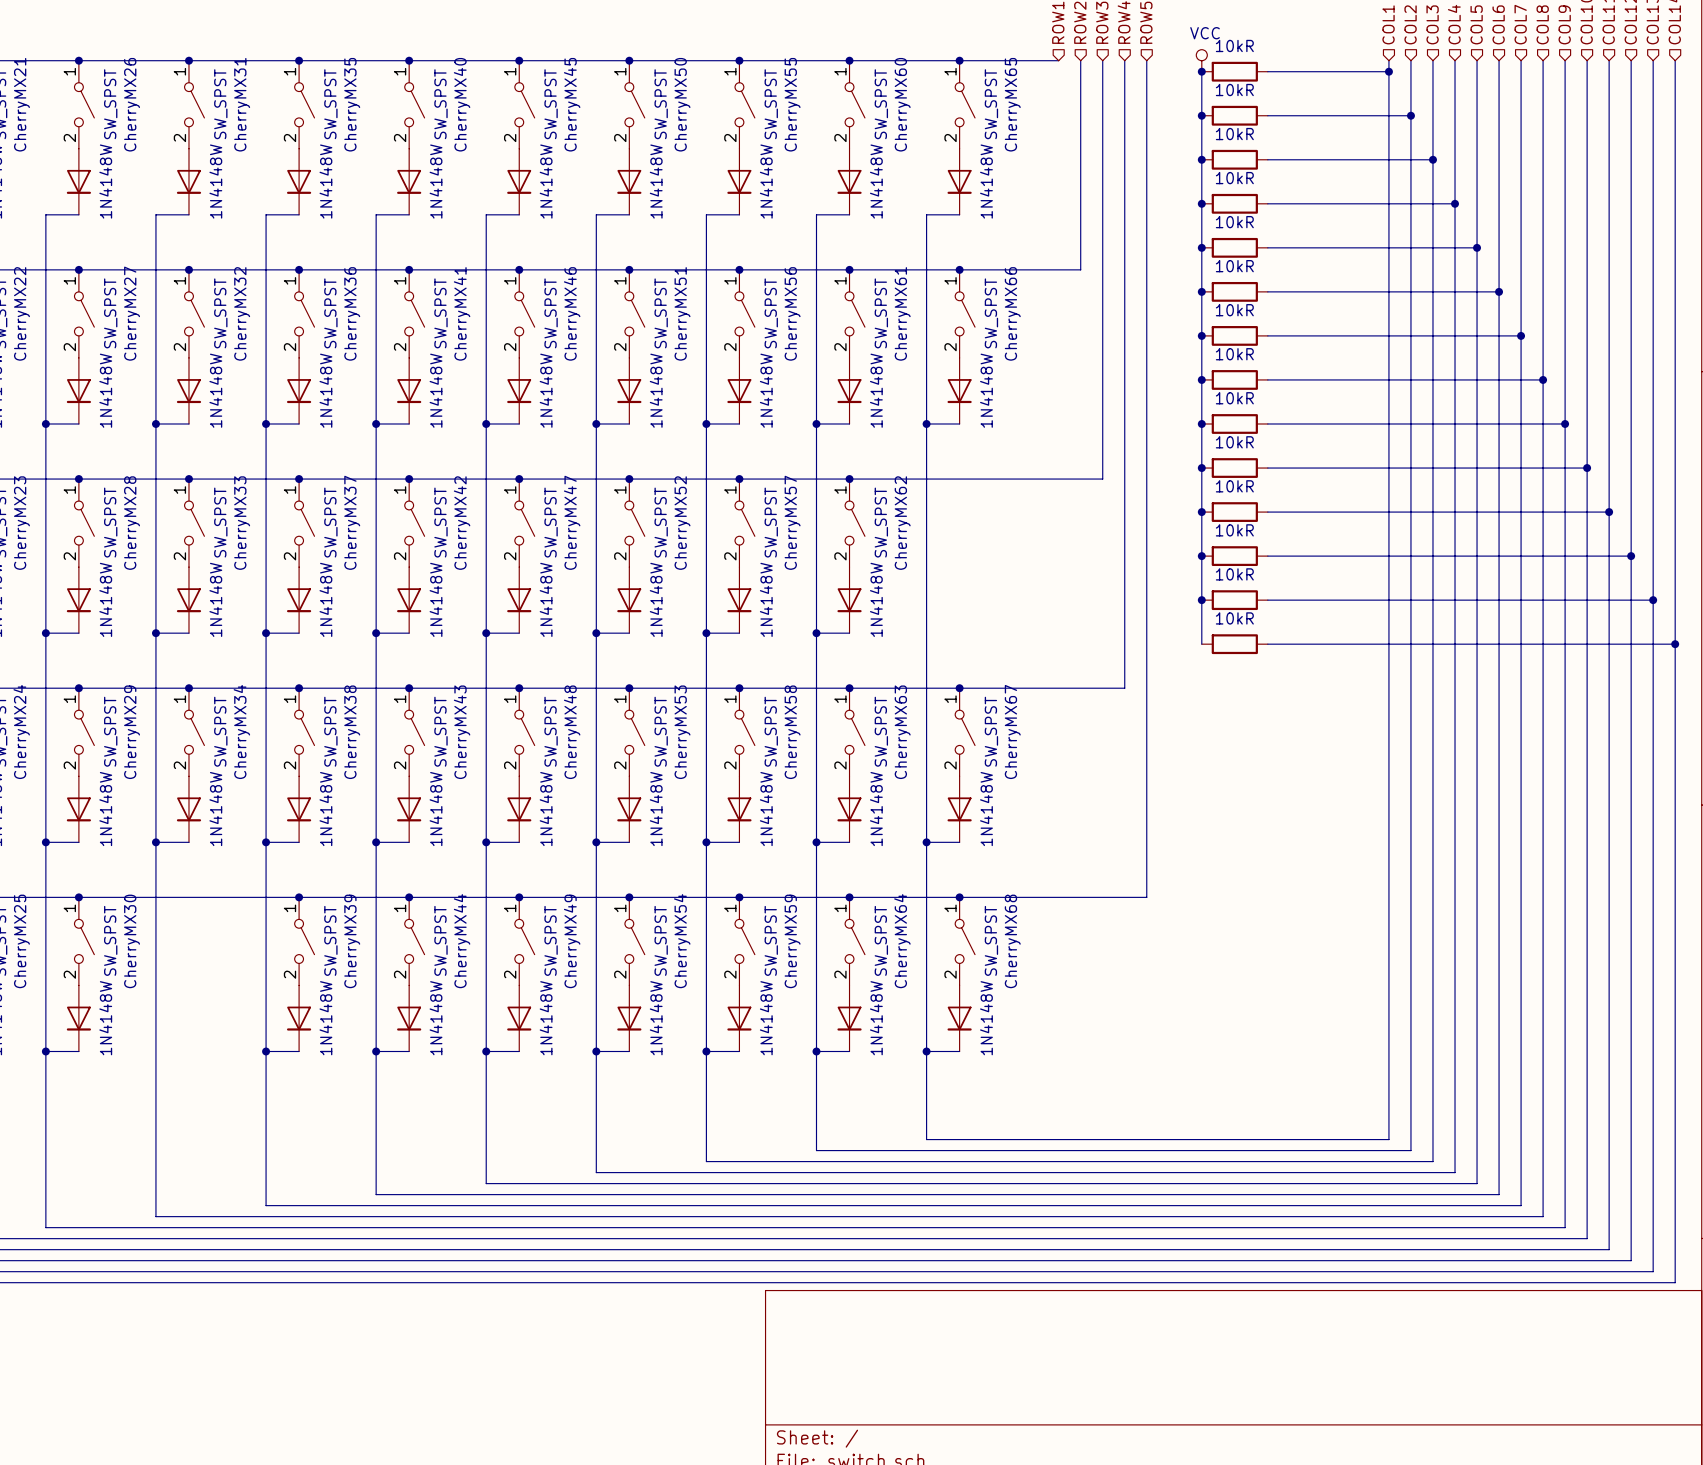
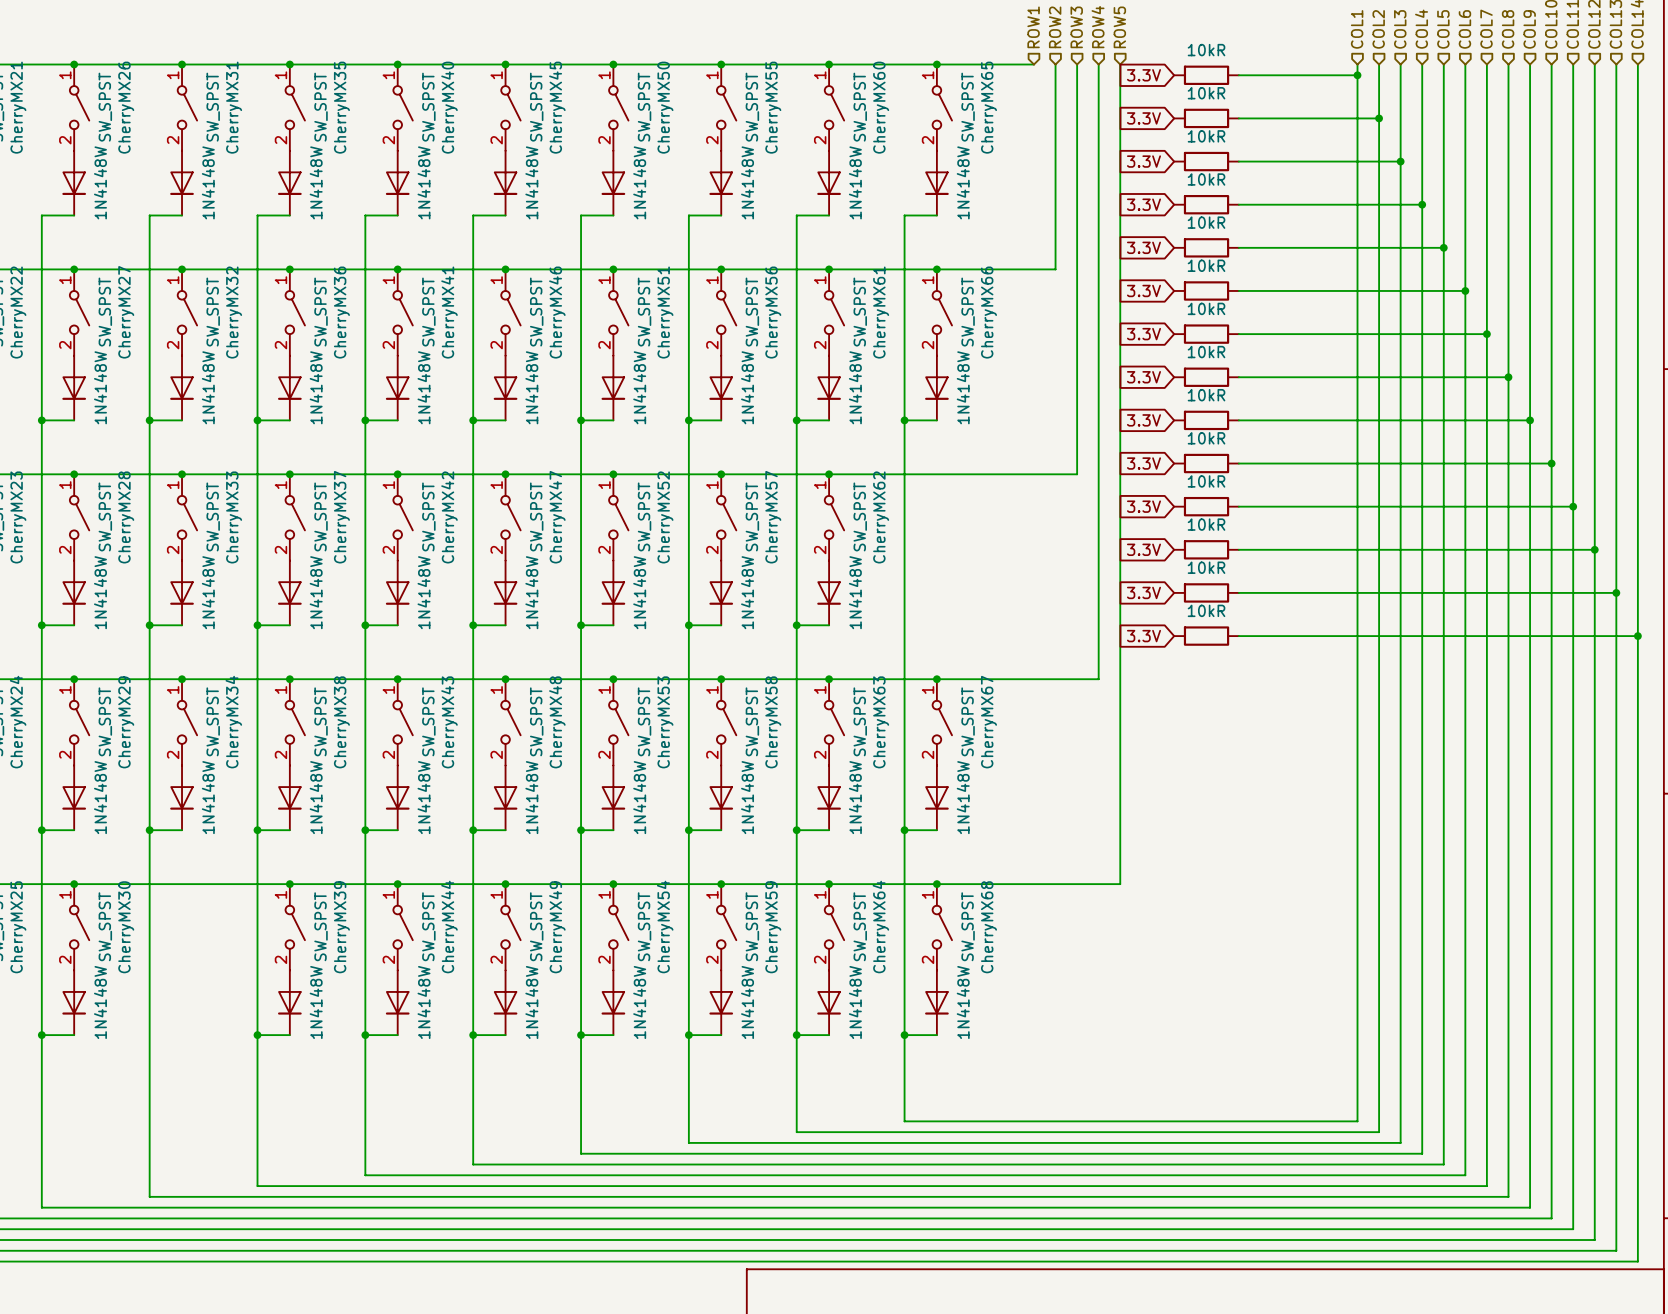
power symbol: VCC (1201, 60) -> none
global label: none -> 3.3V (1143, 75)
wire: (1201, 71) (1201, 644) -> none
junction: (1201, 71) -> none
global label: none -> 3.3V (1143, 118)
junction: (1201, 115) -> none
global label: none -> 3.3V (1143, 161)
junction: (1201, 159) -> none
global label: none -> 3.3V (1143, 204)
junction: (1201, 203) -> none
global label: none -> 3.3V (1143, 247)
junction: (1201, 247) -> none
global label: none -> 3.3V (1143, 290)
junction: (1201, 291) -> none
global label: none -> 3.3V (1143, 334)
junction: (1201, 335) -> none
global label: none -> 3.3V (1143, 377)
junction: (1201, 379) -> none
global label: none -> 3.3V (1143, 420)
junction: (1201, 423) -> none
global label: none -> 3.3V (1143, 463)
junction: (1201, 468) -> none
global label: none -> 3.3V (1143, 506)
junction: (1201, 512) -> none
global label: none -> 3.3V (1143, 549)
junction: (1201, 556) -> none
global label: none -> 3.3V (1143, 592)
junction: (1201, 600) -> none
global label: none -> 3.3V (1143, 636)

